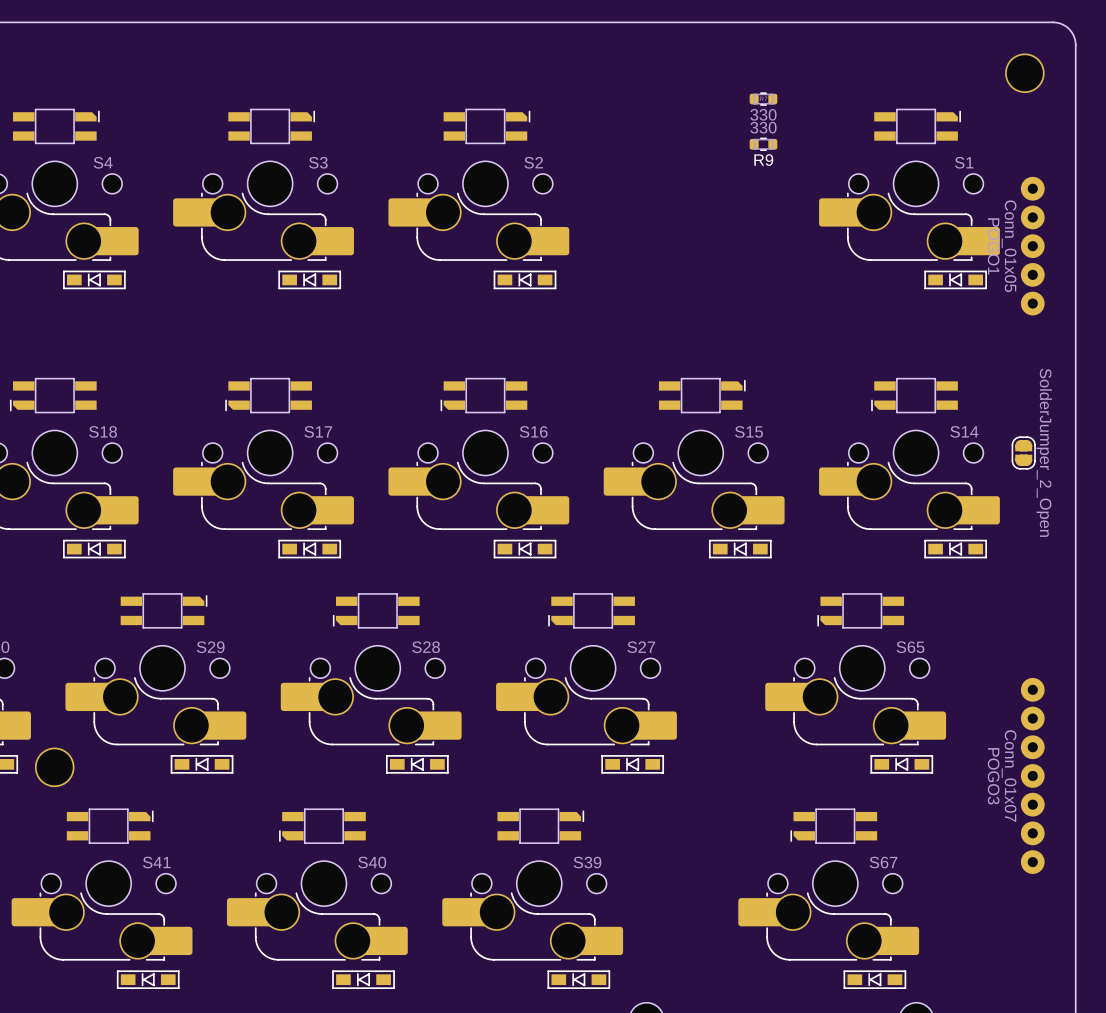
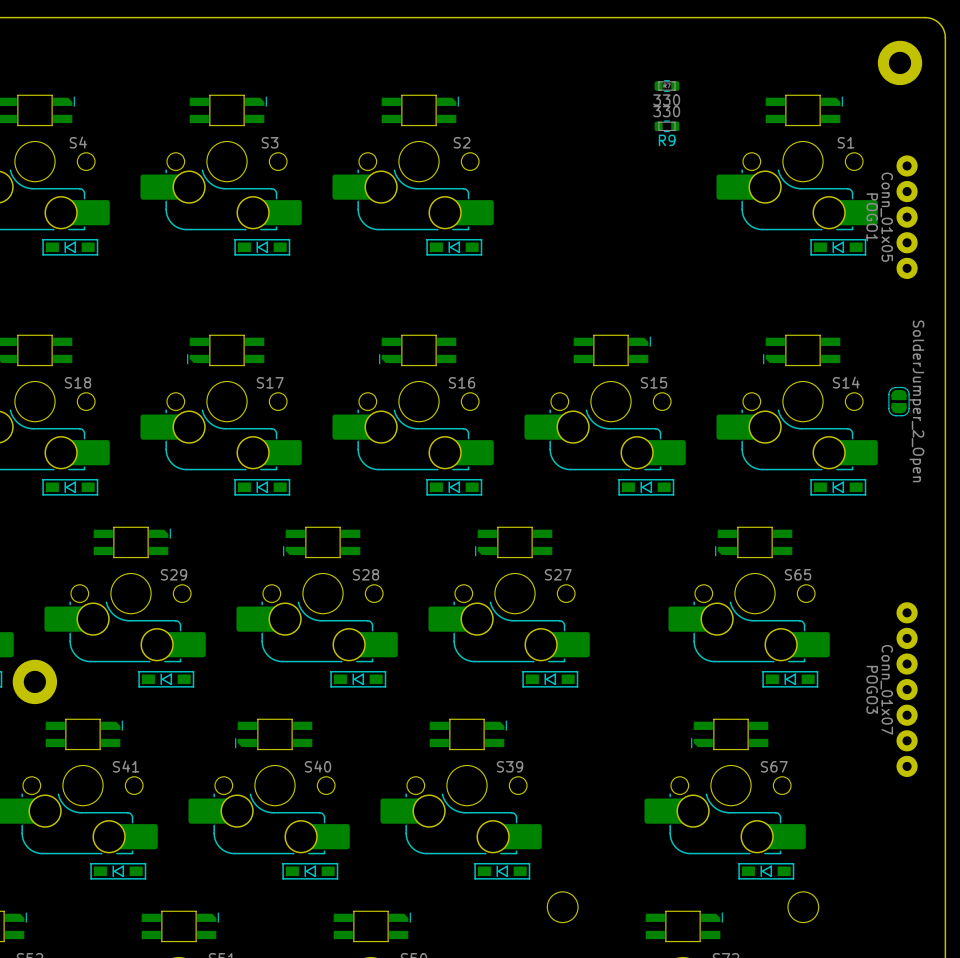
part footprint: [1005, 53, 1045, 94] -> [877, 40, 923, 86]
part footprint: [34, 747, 75, 788] -> [12, 659, 58, 705]

